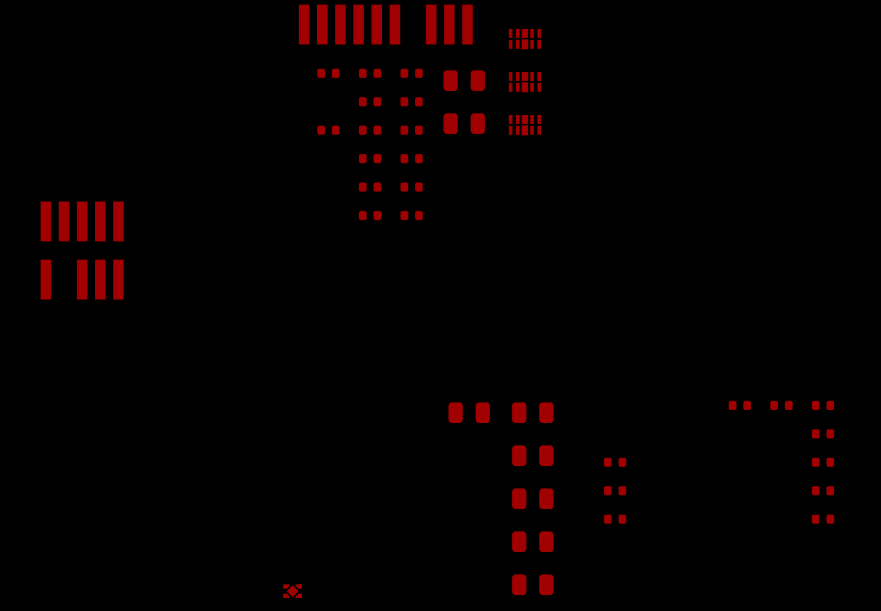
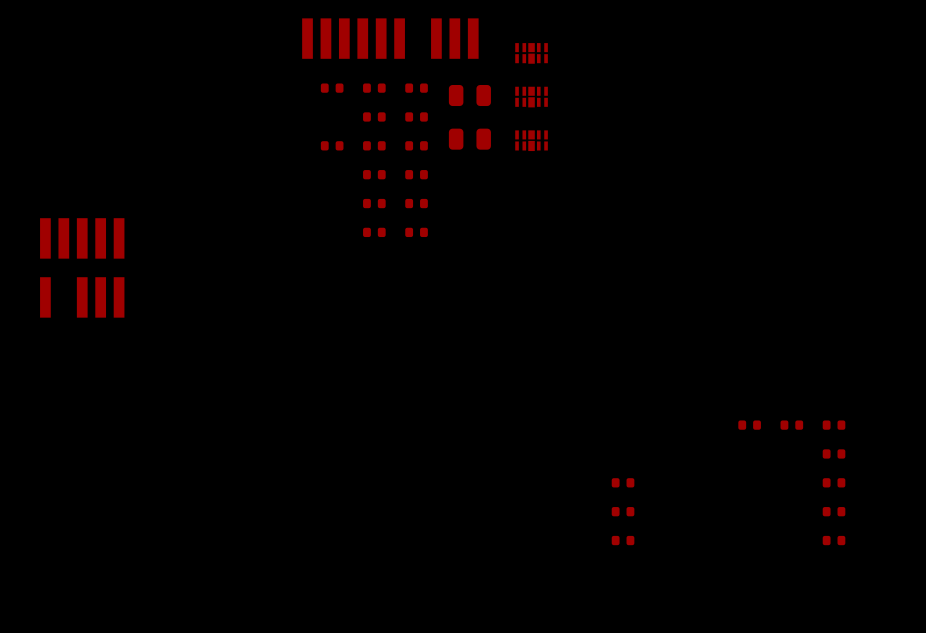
part: (469, 412) -> none
part: (532, 412) -> none
part: (532, 455) -> none
part: (532, 498) -> none
part: (532, 541) -> none
part: (532, 584) -> none
part: (292, 591) -> none

